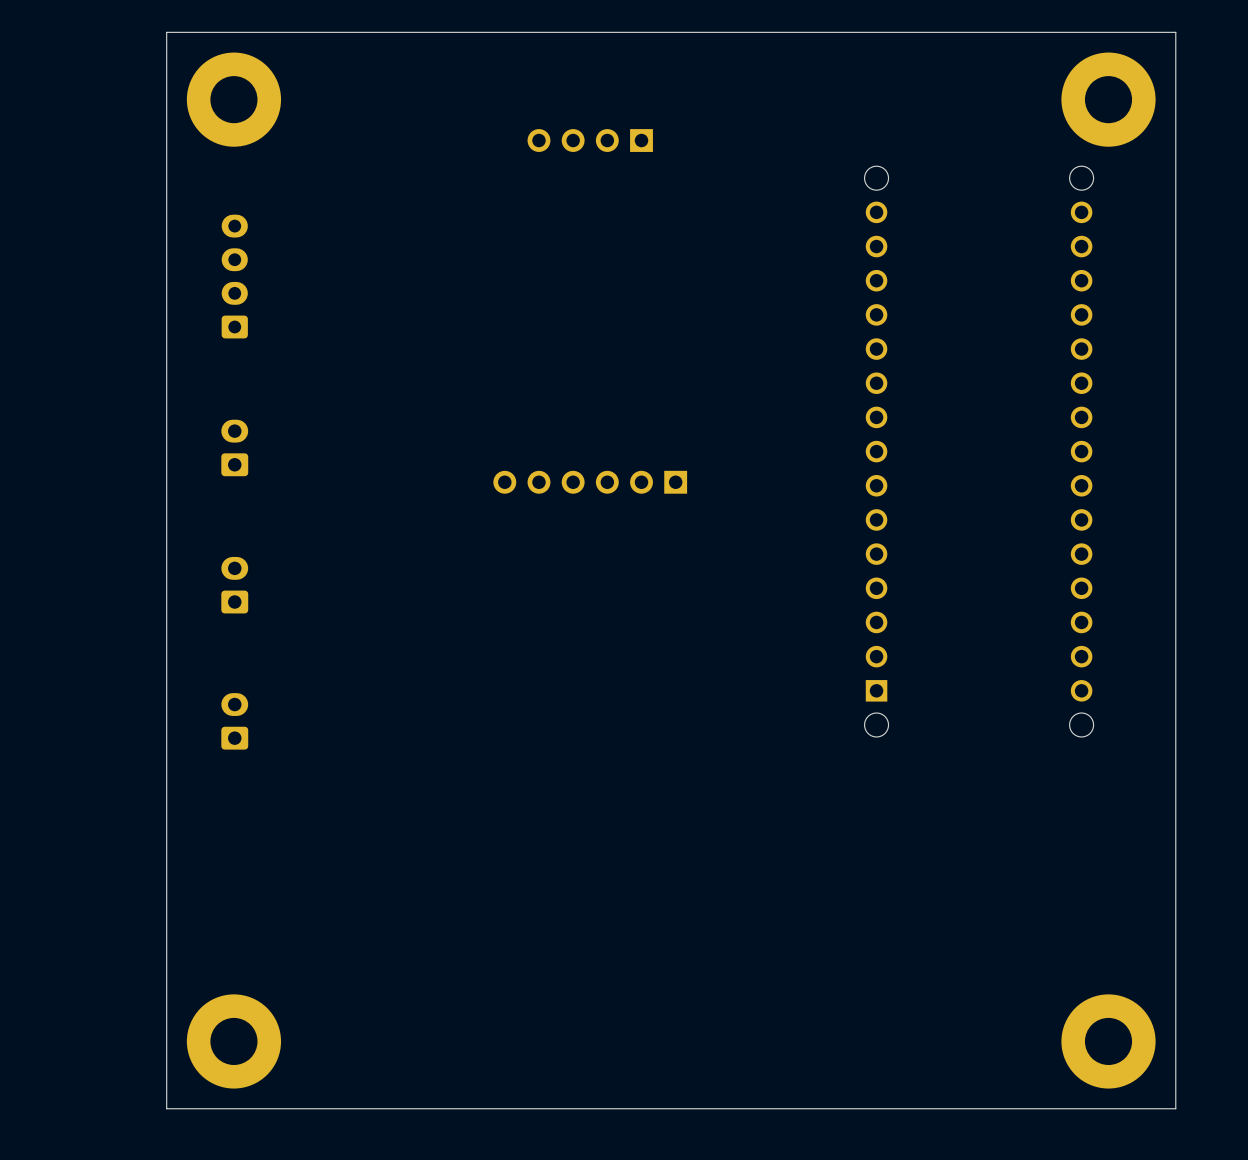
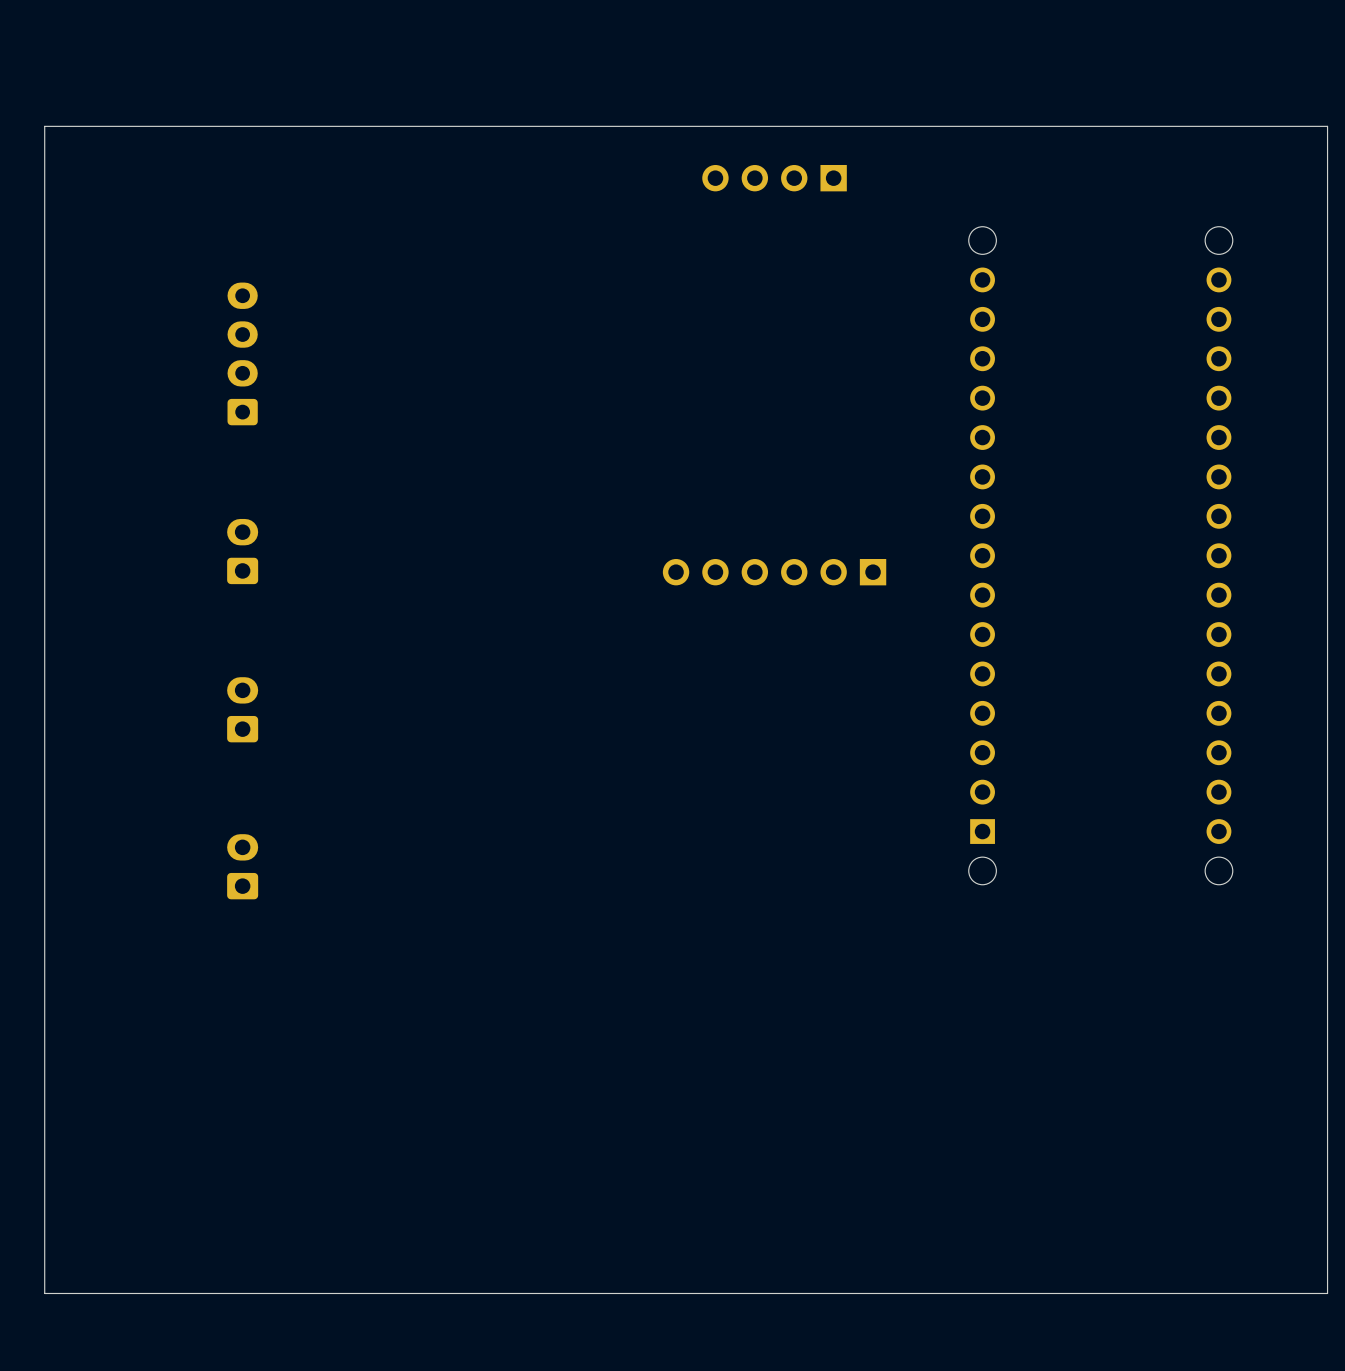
board edge: (1175, 79) (1175, 32) (166, 32) (166, 1108) (1175, 1108) (1175, 1091) -> (1327, 126) (44, 126) (44, 1293) (1327, 1293)
part: (233, 99) -> none
part: (1108, 99) -> none
part position: (590, 140) -> (774, 178)
part position: (590, 482) -> (774, 572)
part: (233, 1041) -> none
part: (1108, 1041) -> none

